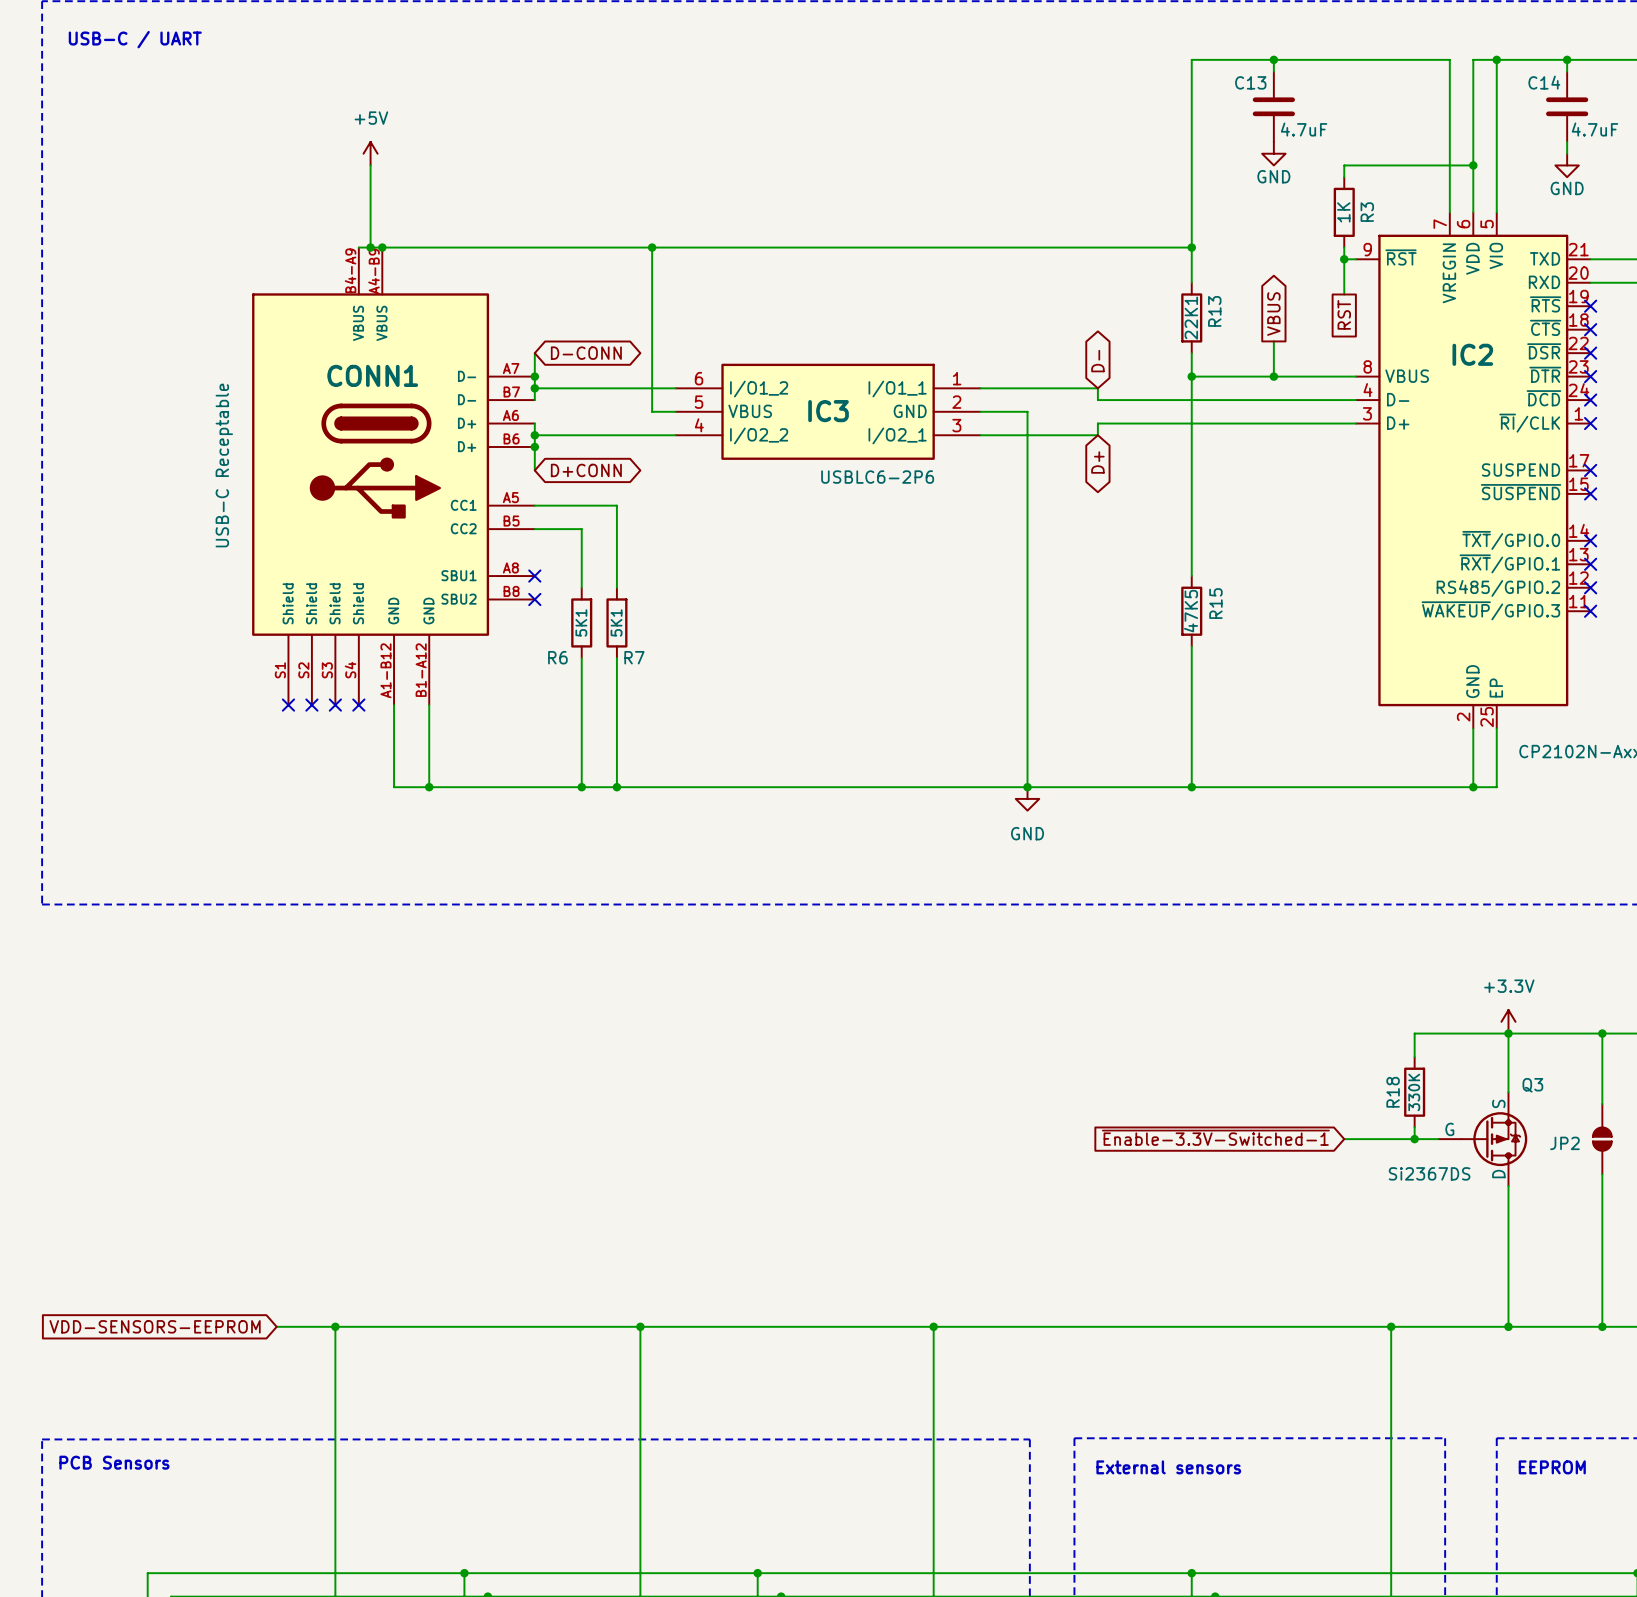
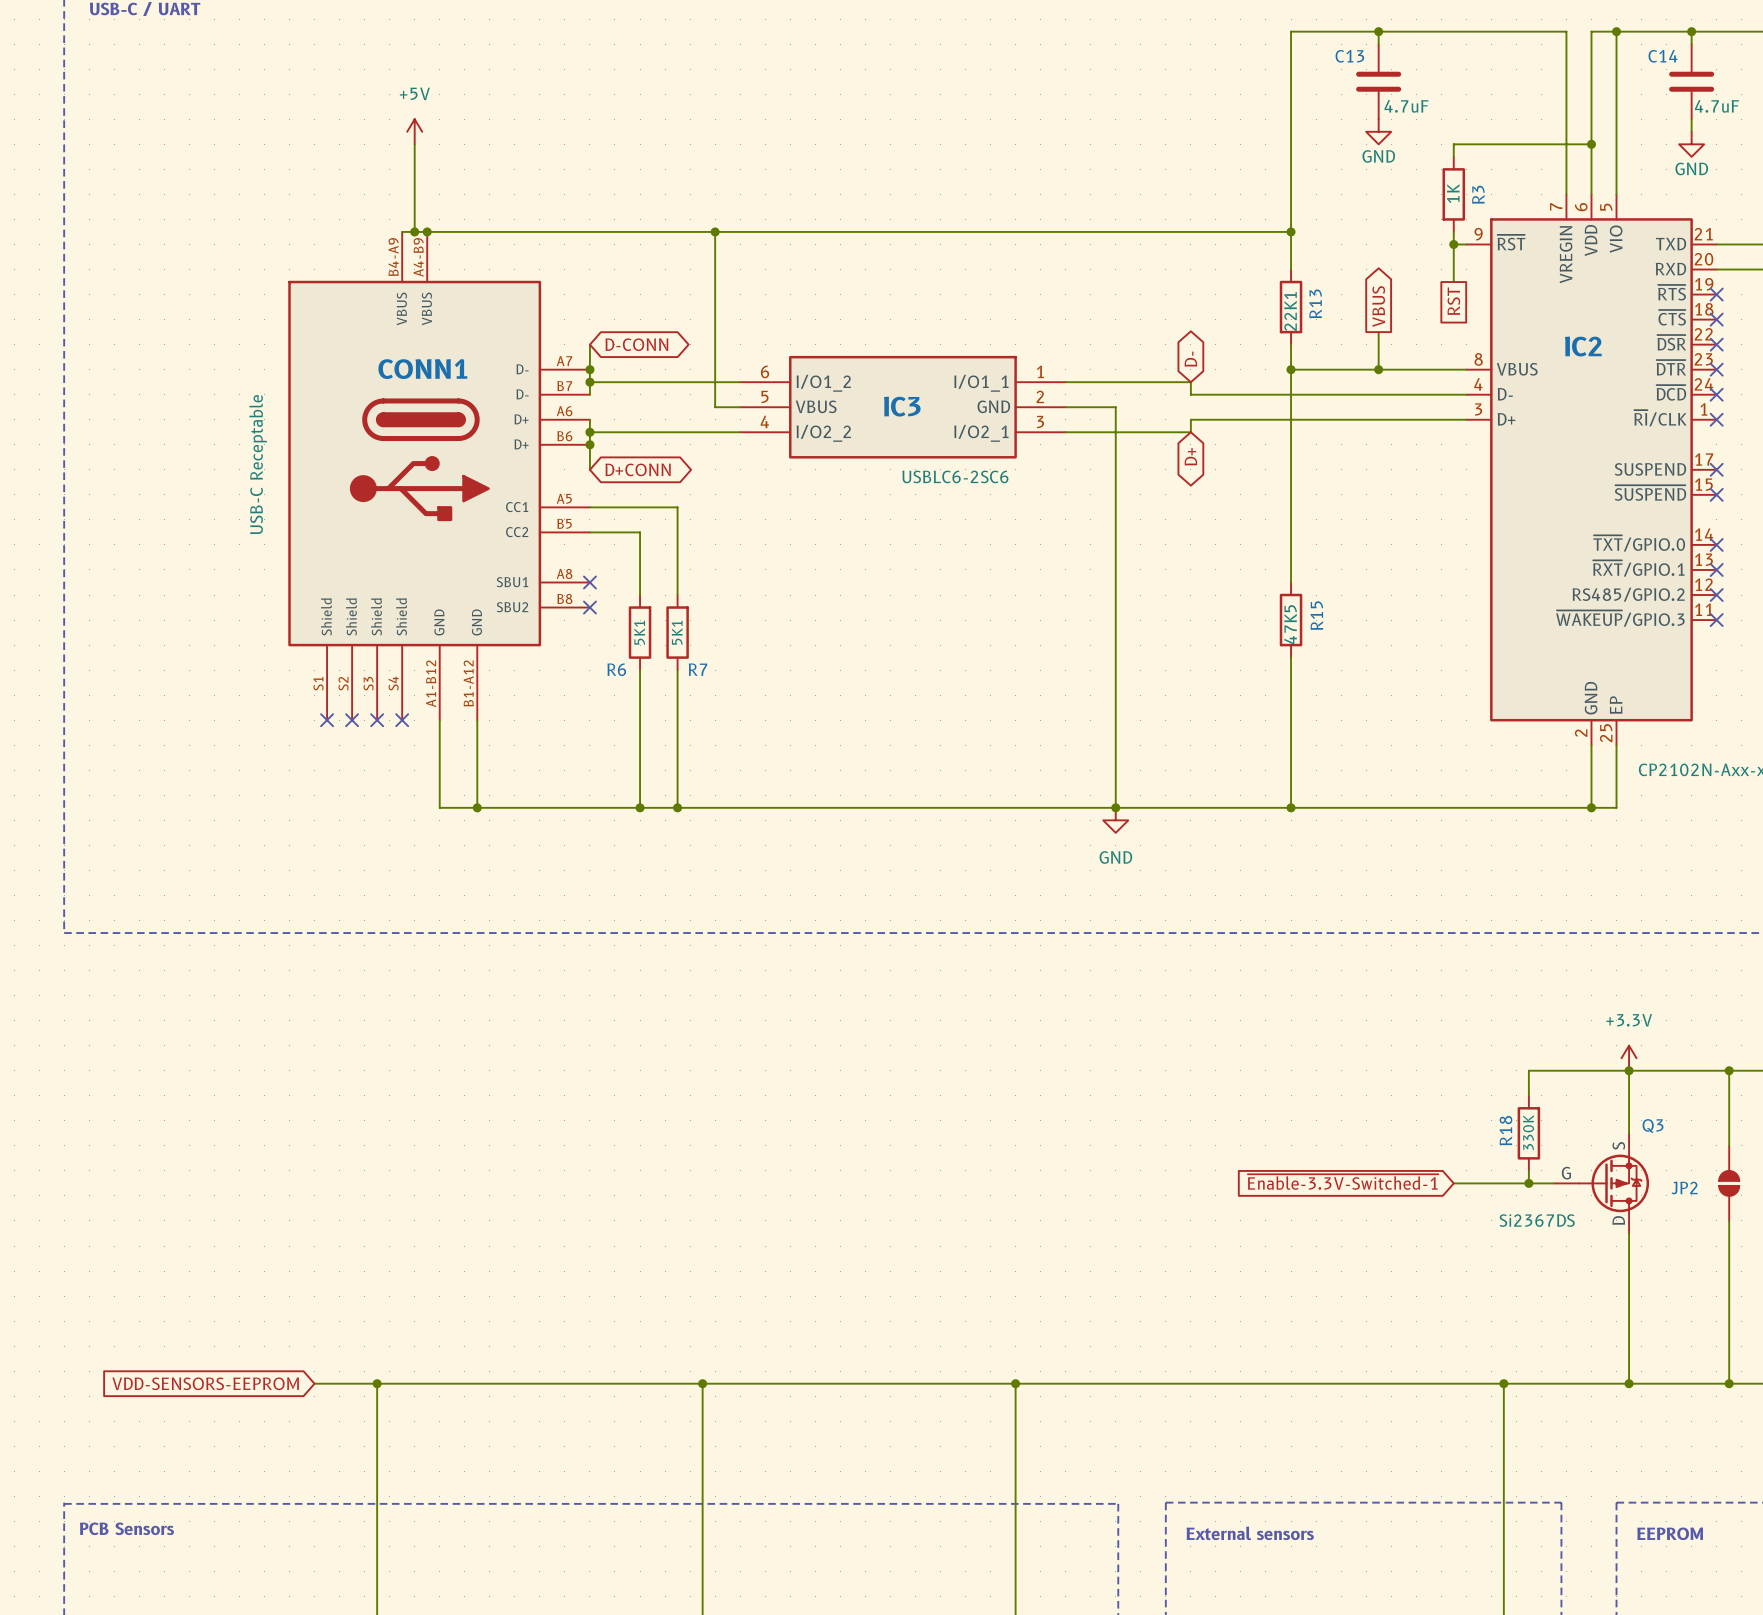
IC3 value: USBLC6-2P6 (877, 477) -> USBLC6-2SC6 (955, 476)

